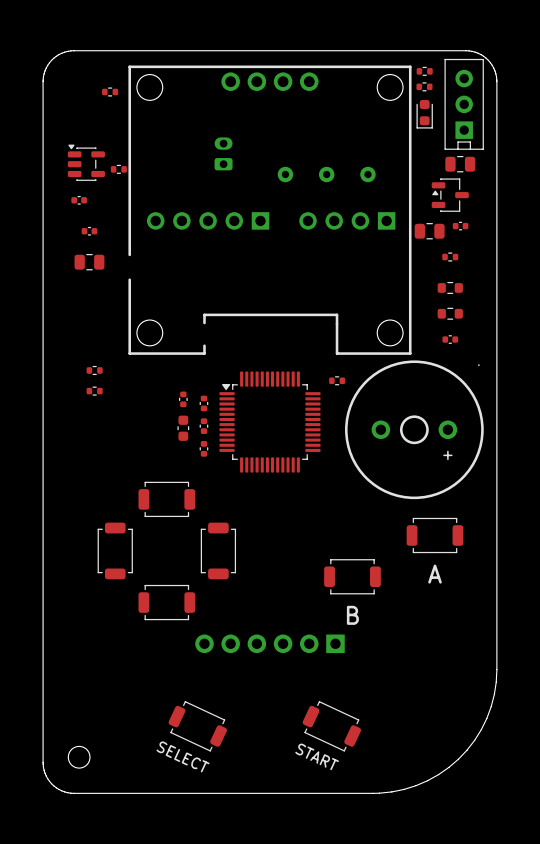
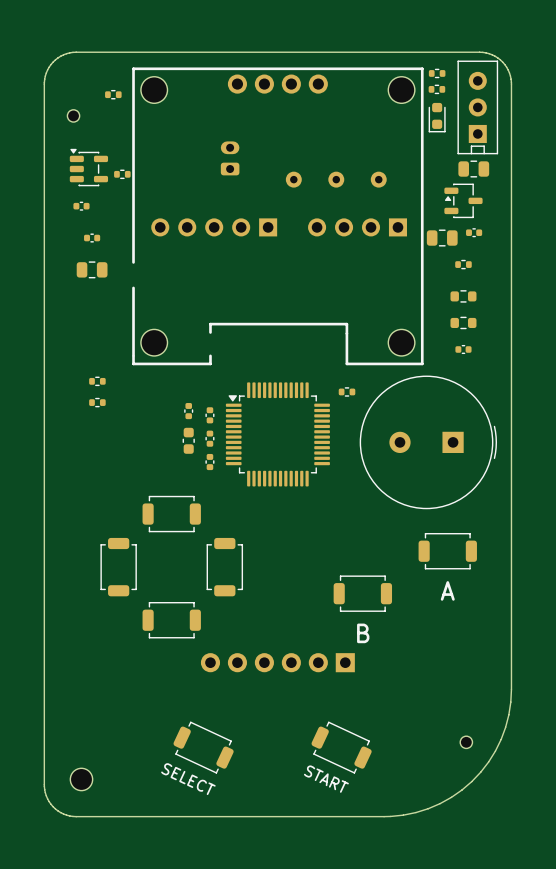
part: none -> (73, 115)
part footprint: [345, 360, 484, 500] -> [359, 375, 497, 510]
part: none -> (466, 742)

